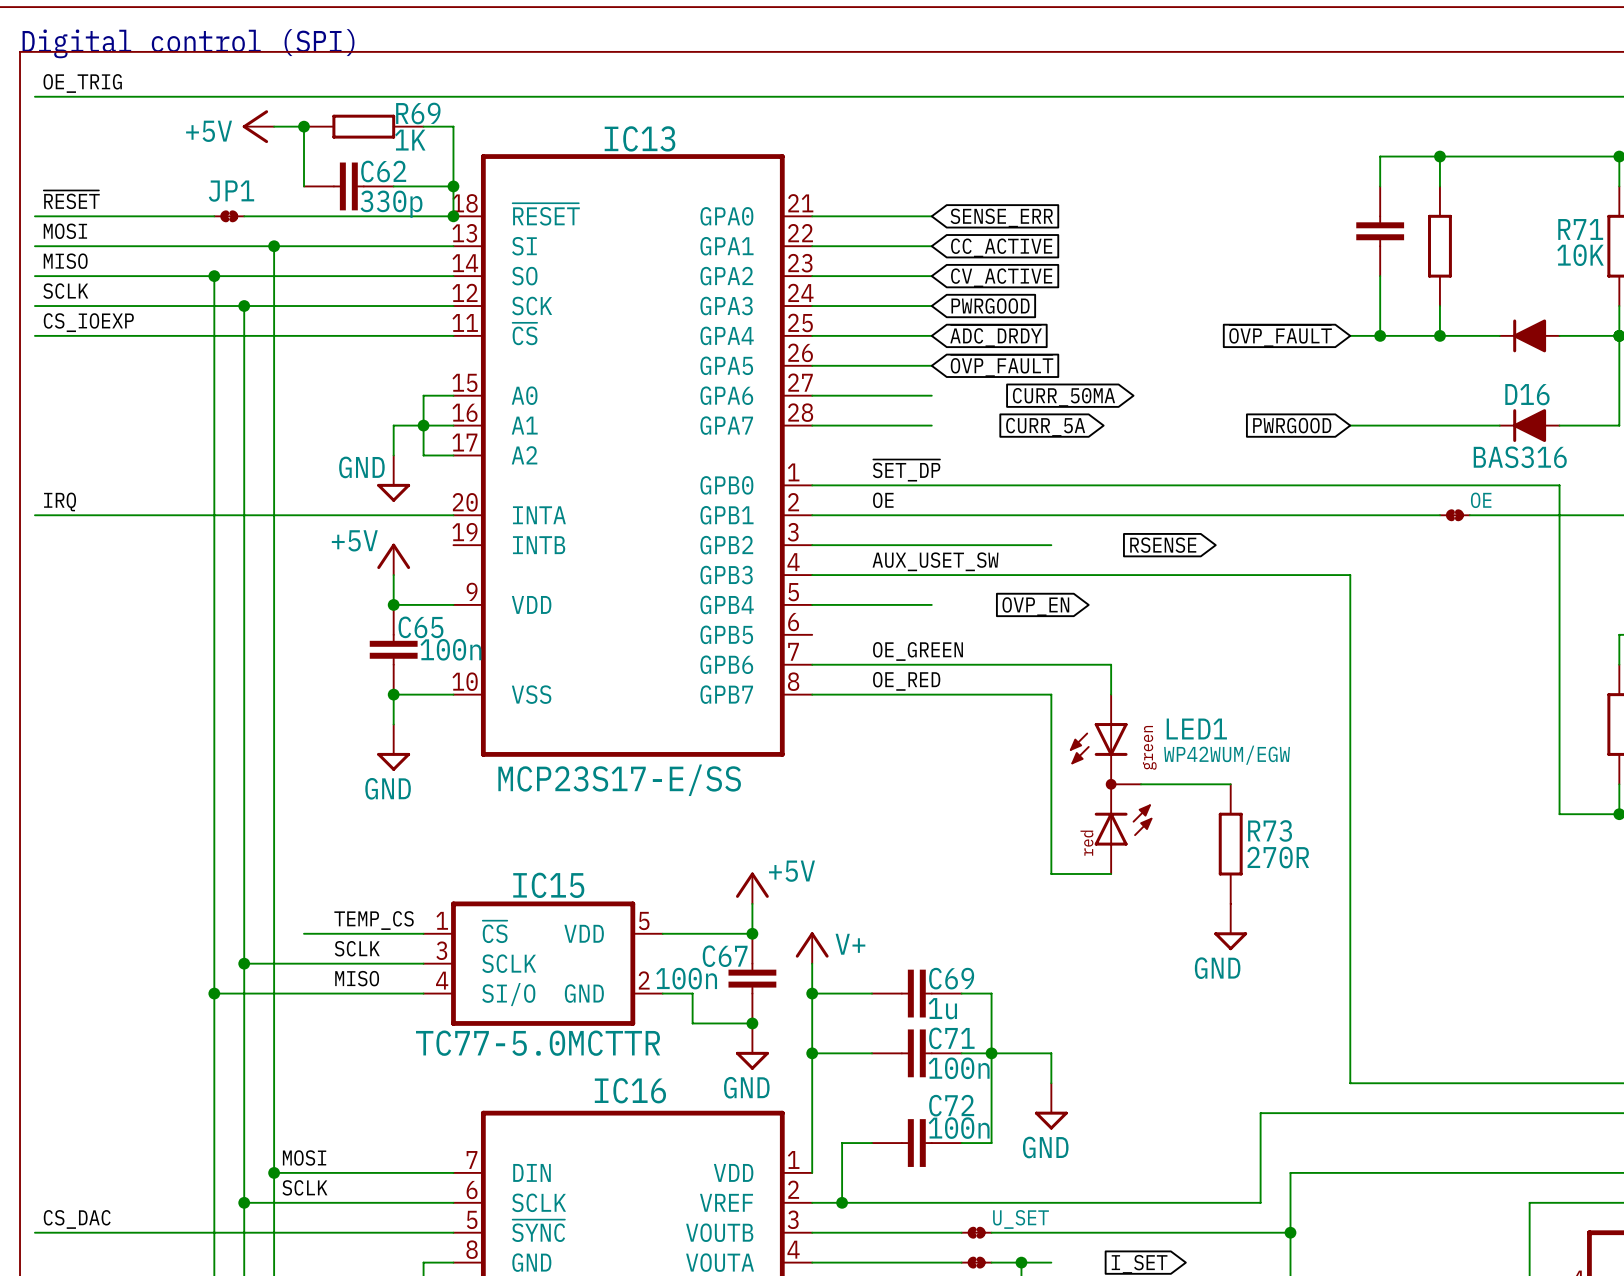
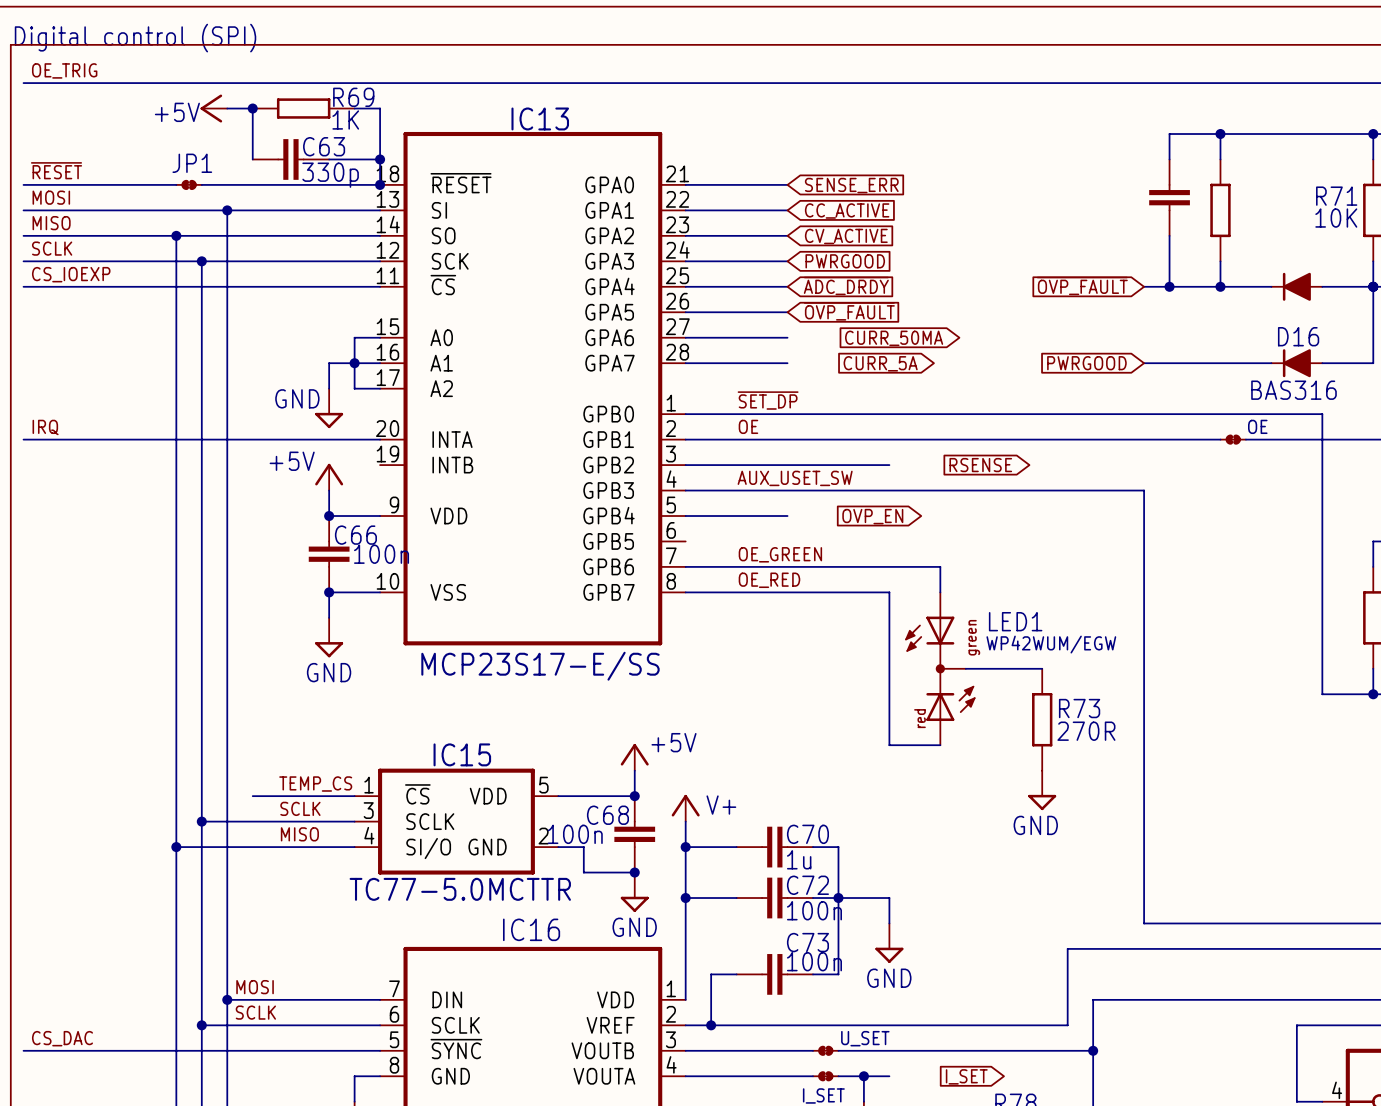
C62 name: C62 (383, 171) -> C63 (324, 146)
C65 name: C65 (420, 627) -> C66 (355, 535)
C67 name: C67 (725, 956) -> C68 (607, 815)
C69 name: C69 (951, 978) -> C70 (807, 834)
C71 name: C71 (951, 1038) -> C72 (807, 885)
C72 name: C72 (951, 1105) -> C73 (807, 942)

